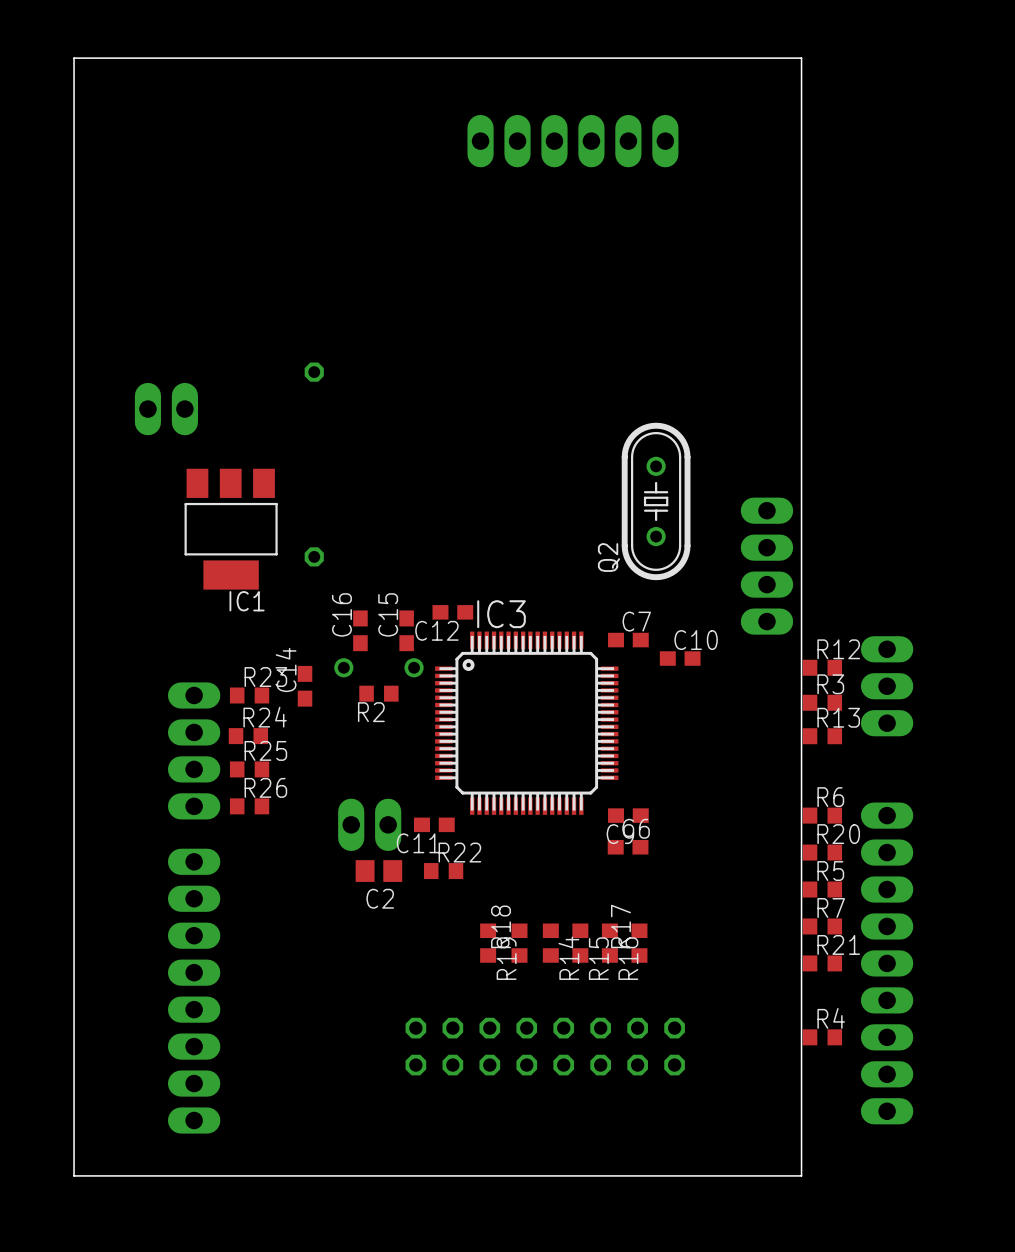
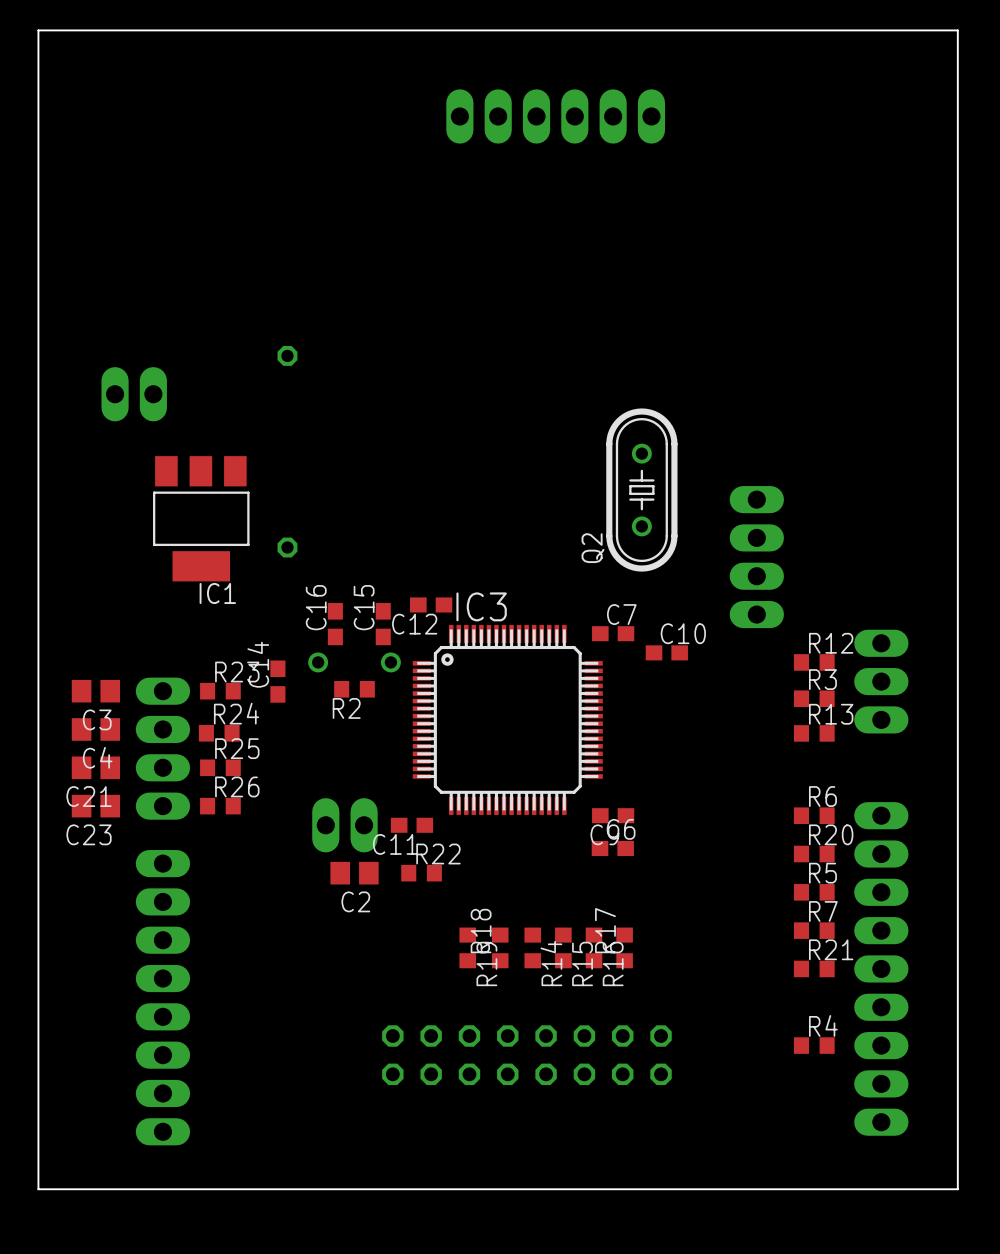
board edge: (801, 58) (801, 1175) -> (792, 30) (957, 30) (957, 1189) (792, 1189)
C3: none -> (95, 691)
C4: none -> (95, 729)
C21: none -> (95, 767)
C23: none -> (95, 806)

